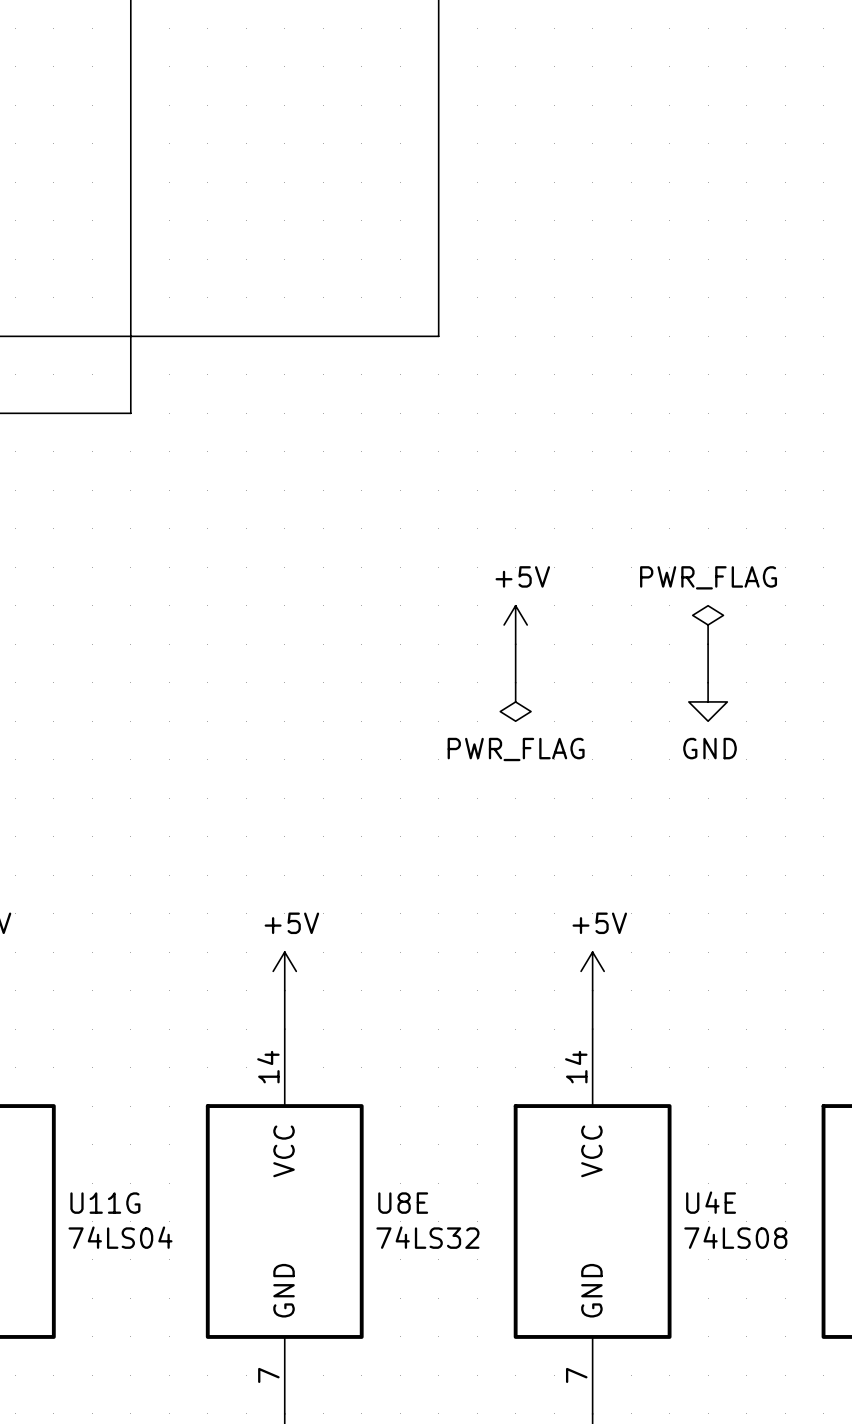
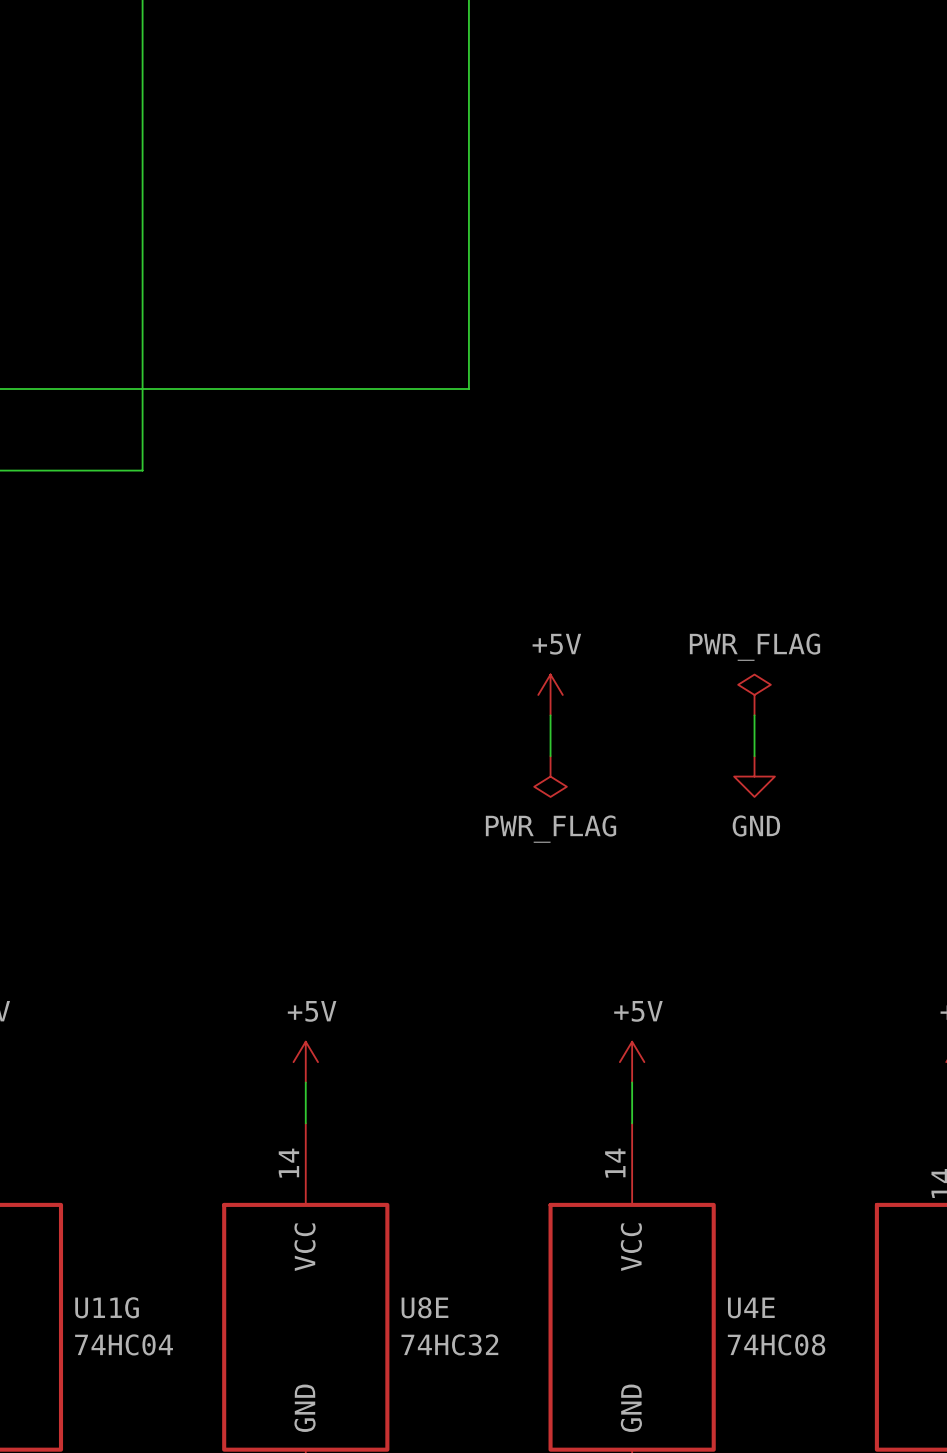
U11G value: 74LS04 (120, 1237) -> 74HC04 (124, 1344)
U8E value: 74LS32 (427, 1237) -> 74HC32 (449, 1344)
U4E value: 74LS08 (735, 1237) -> 74HC08 (776, 1344)

